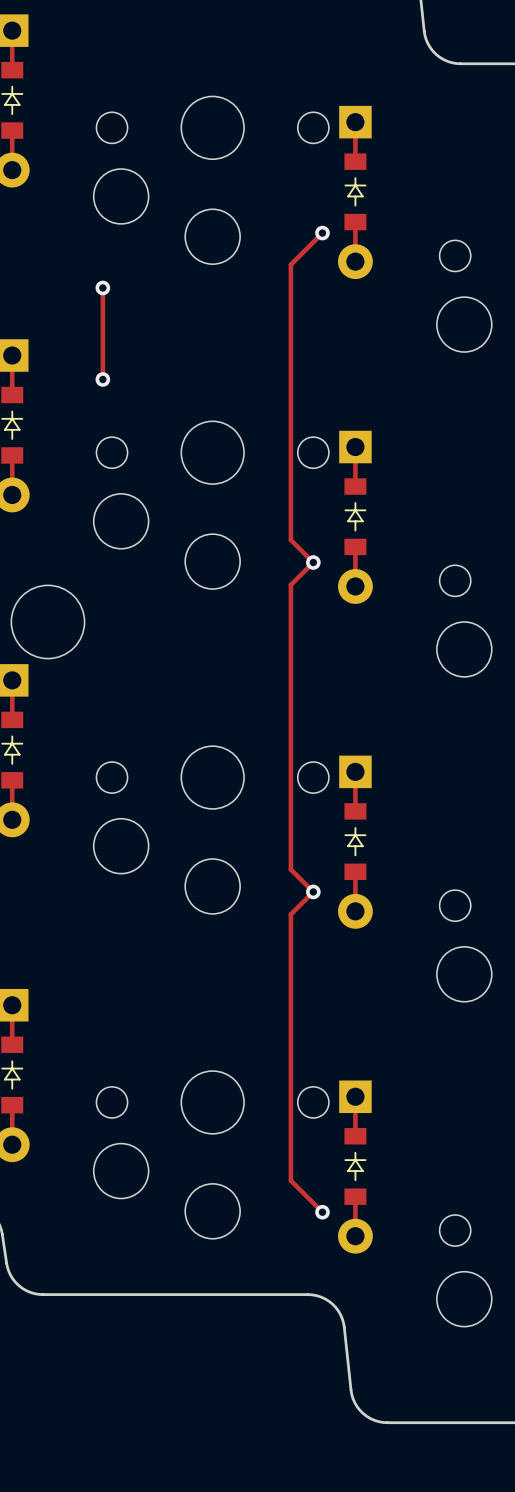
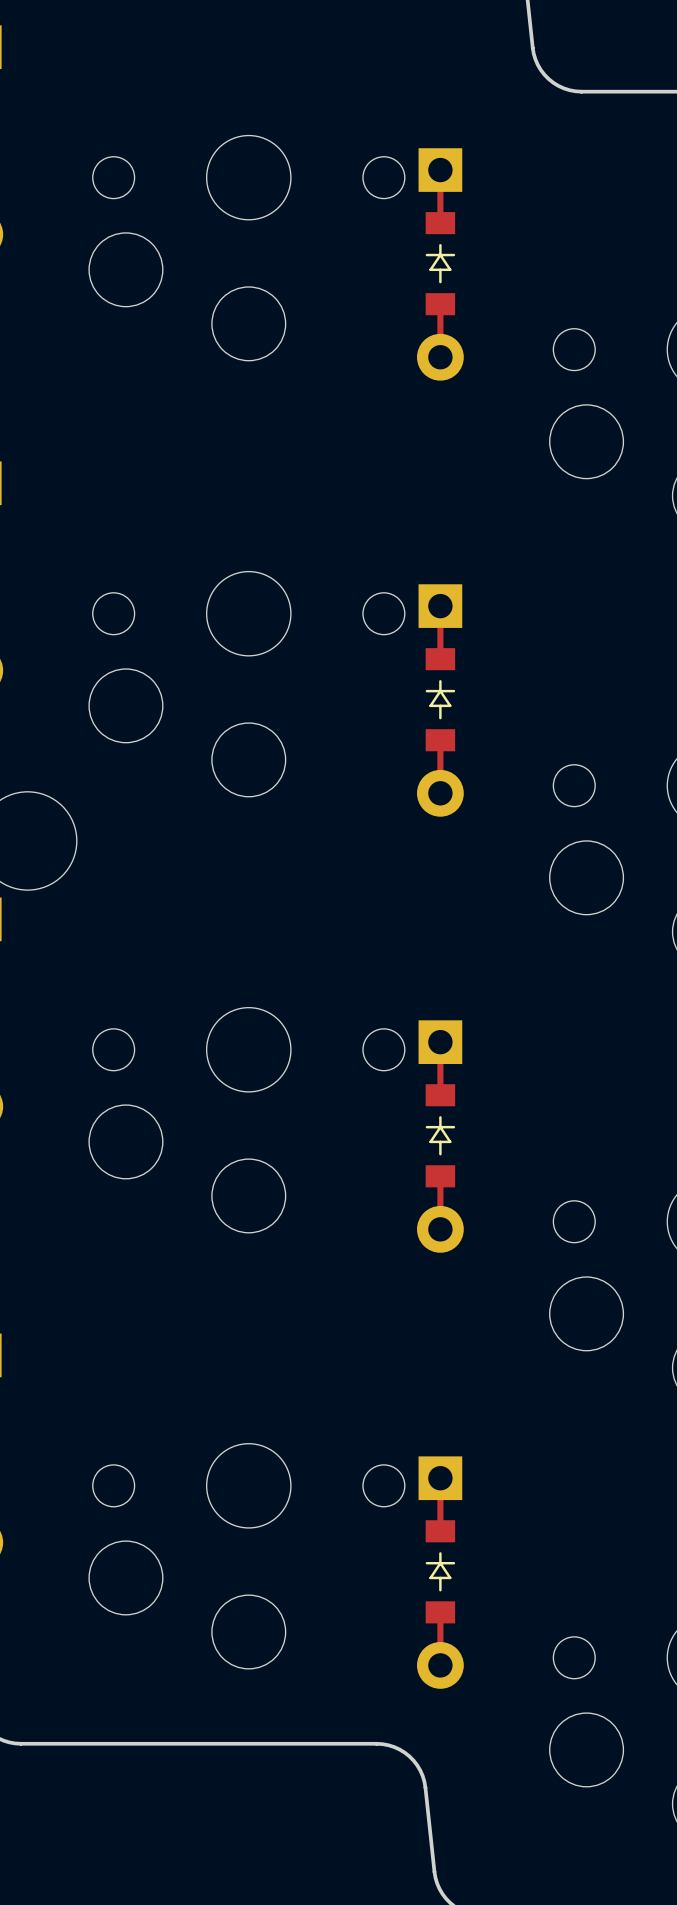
track: (322, 233) (290, 264) (290, 540) (313, 562) (290, 584) (290, 869) (313, 891) (290, 914) (290, 1180) (322, 1212) -> none
via: (322, 233) -> none
track: (102, 287) (102, 379) -> none
via: (102, 287) -> none
via: (102, 379) -> none
via: (313, 562) -> none
via: (313, 891) -> none
via: (322, 1212) -> none

